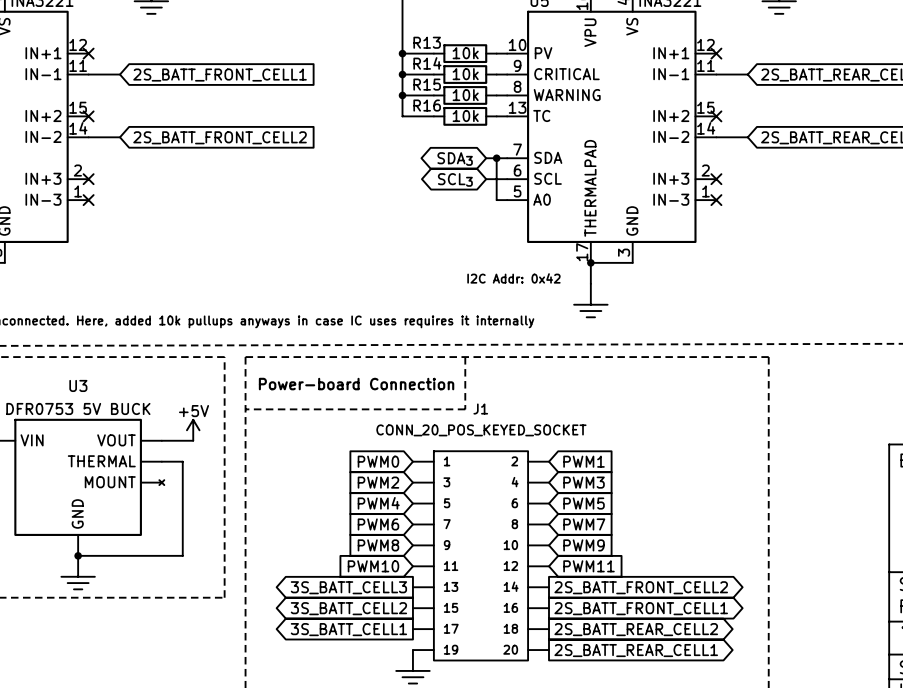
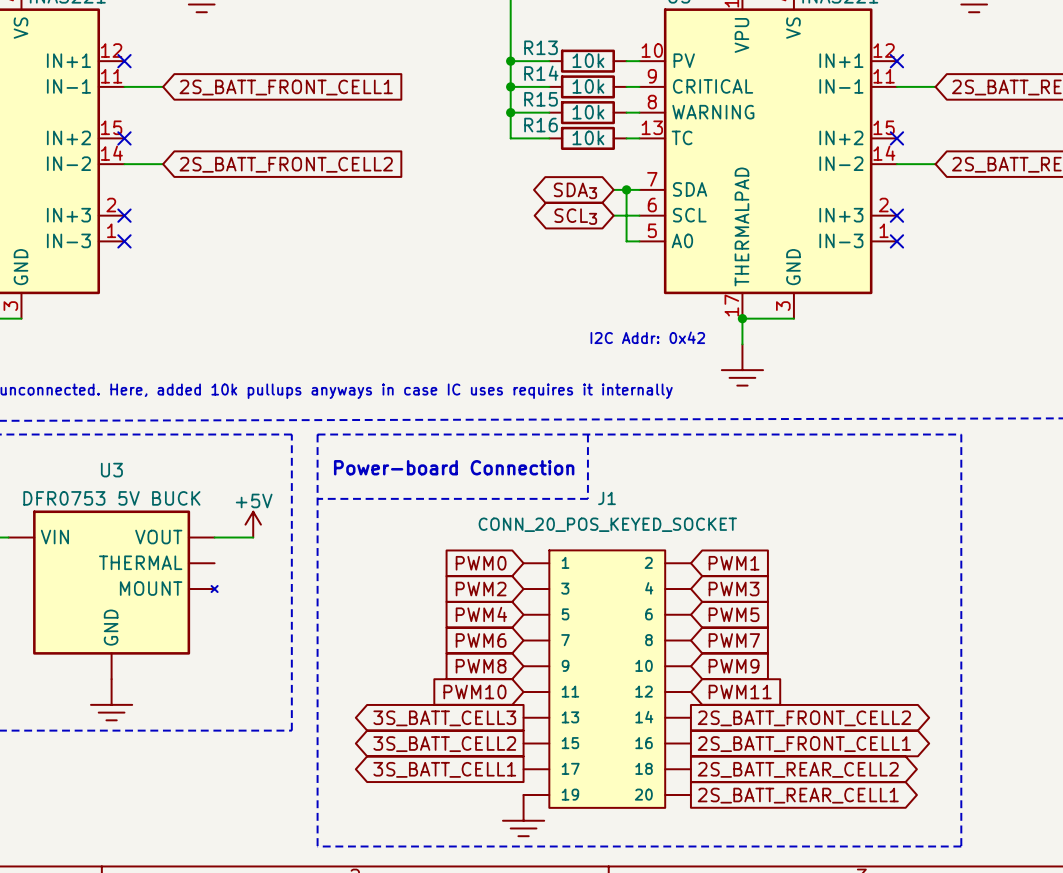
wire: (161, 461) (182, 461) (182, 555) (78, 555) -> none
junction: (78, 555) -> none

